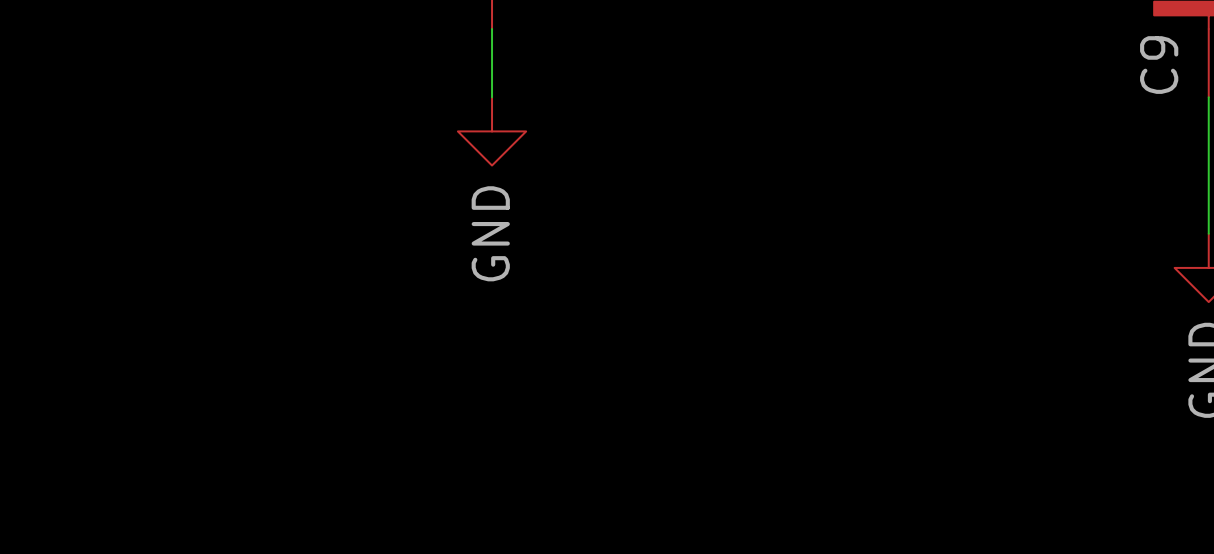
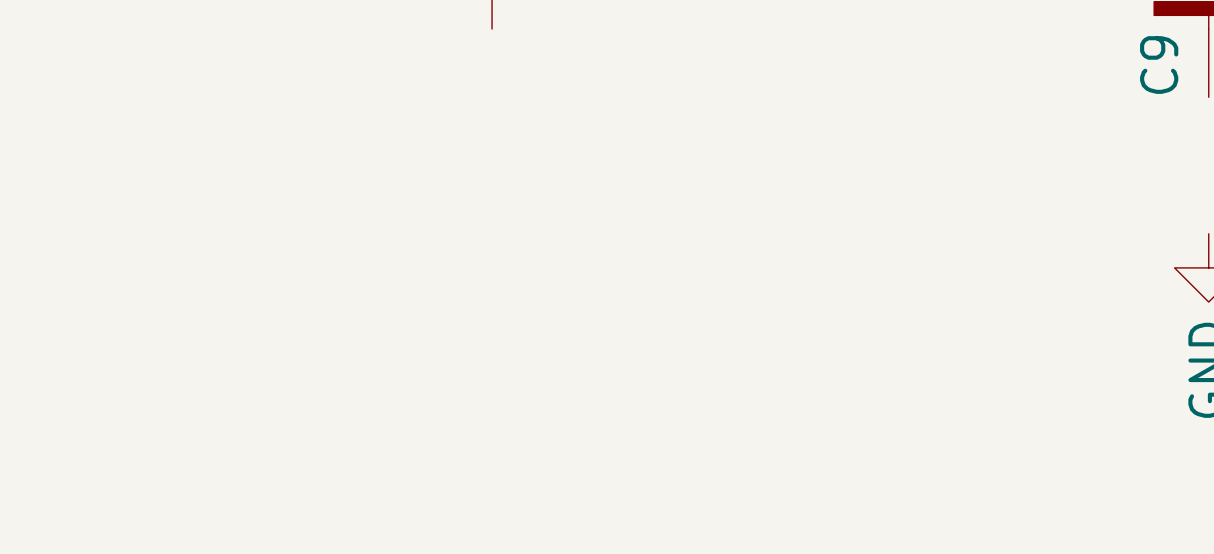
wire: (492, 29) (492, 97) -> none
wire: (1208, 97) (1208, 233) -> none
power symbol: GND (492, 131) -> none

